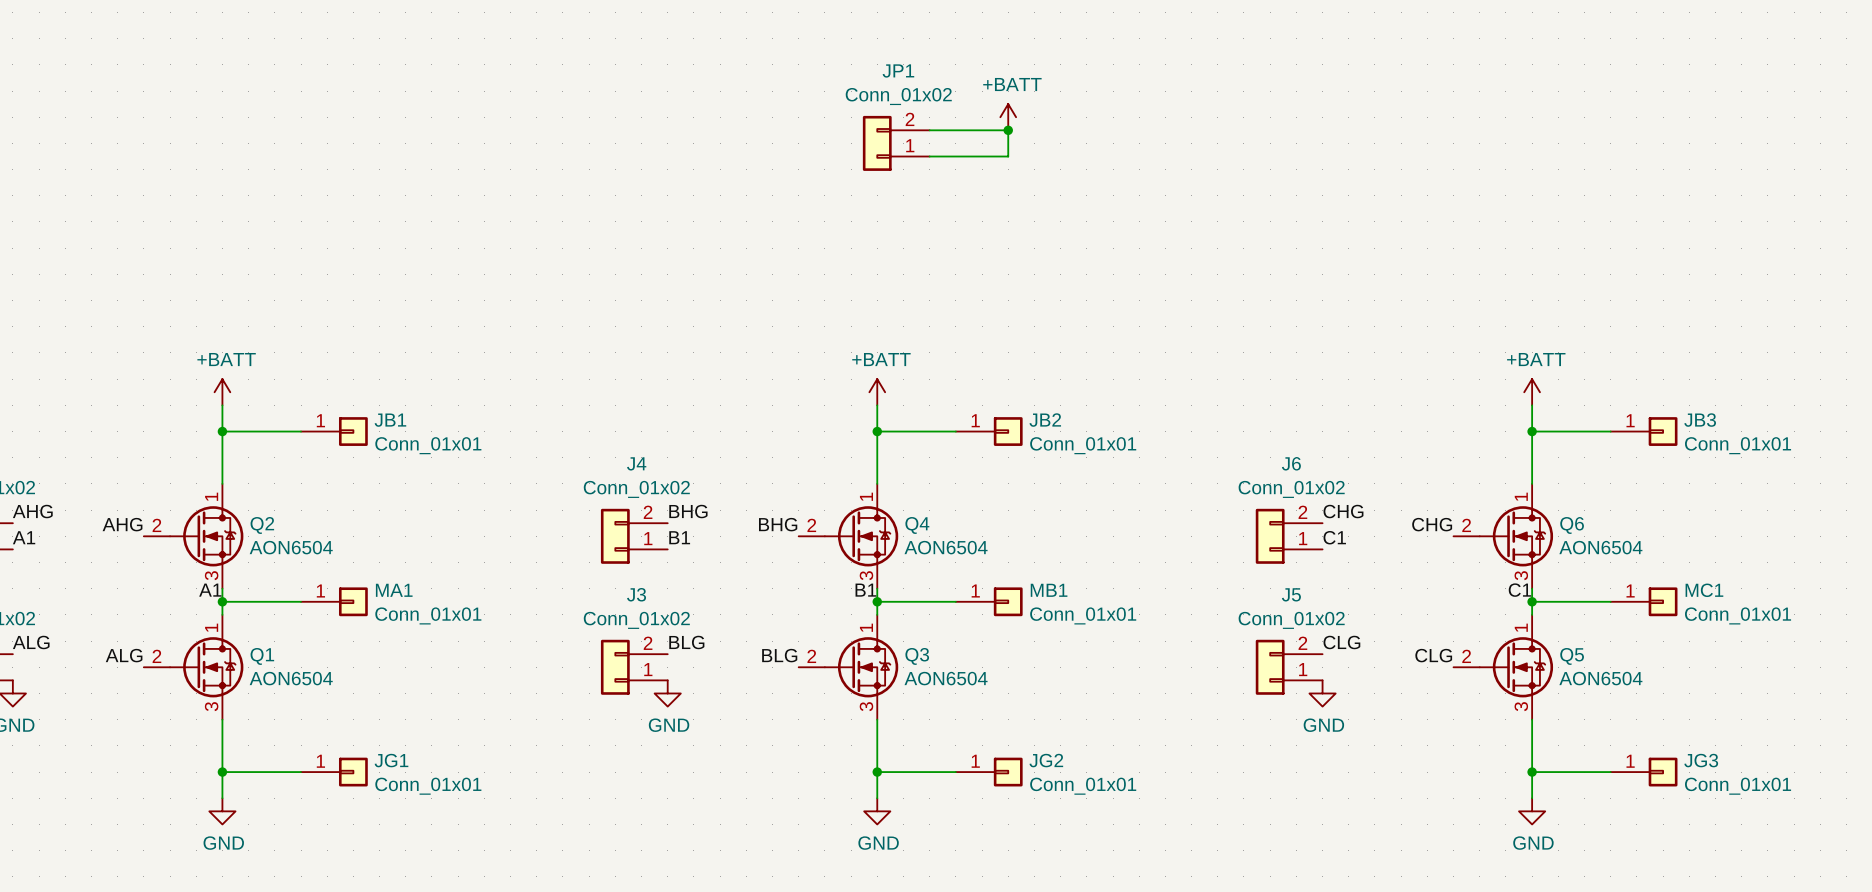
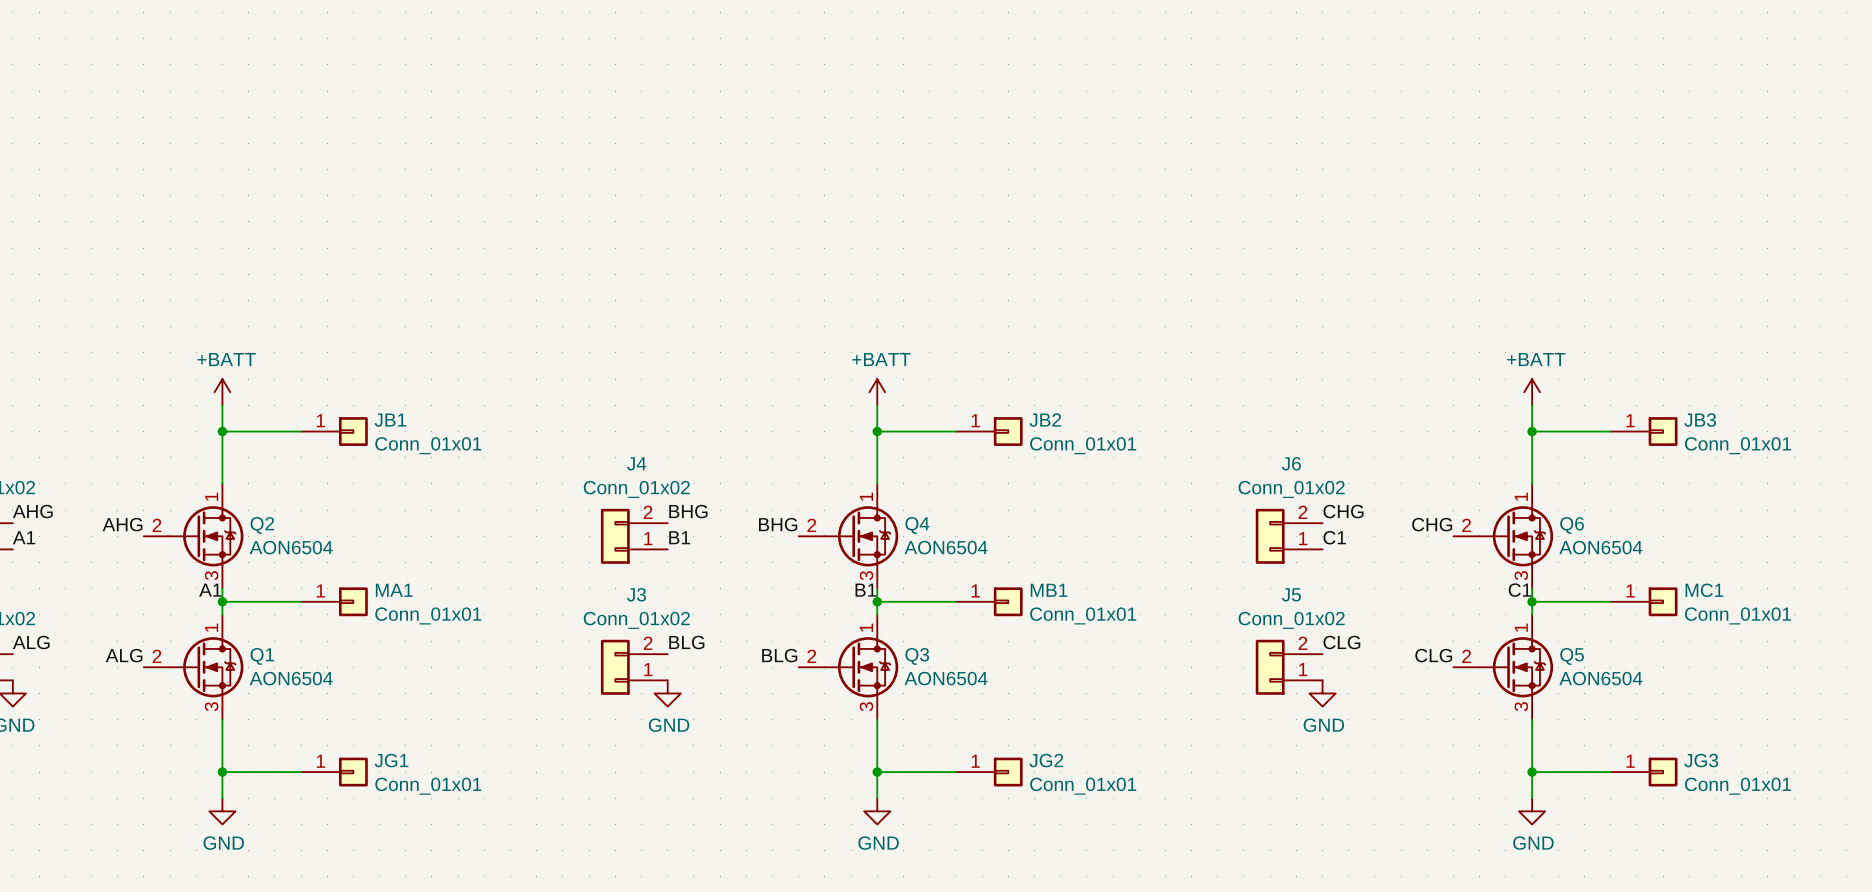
power symbol: +BATT (1008, 117) -> none
wire: (929, 130) (1008, 130) (1008, 156) (929, 156) -> none
junction: (1008, 130) -> none
JP1: Conn_01x02 (896, 143) -> none

